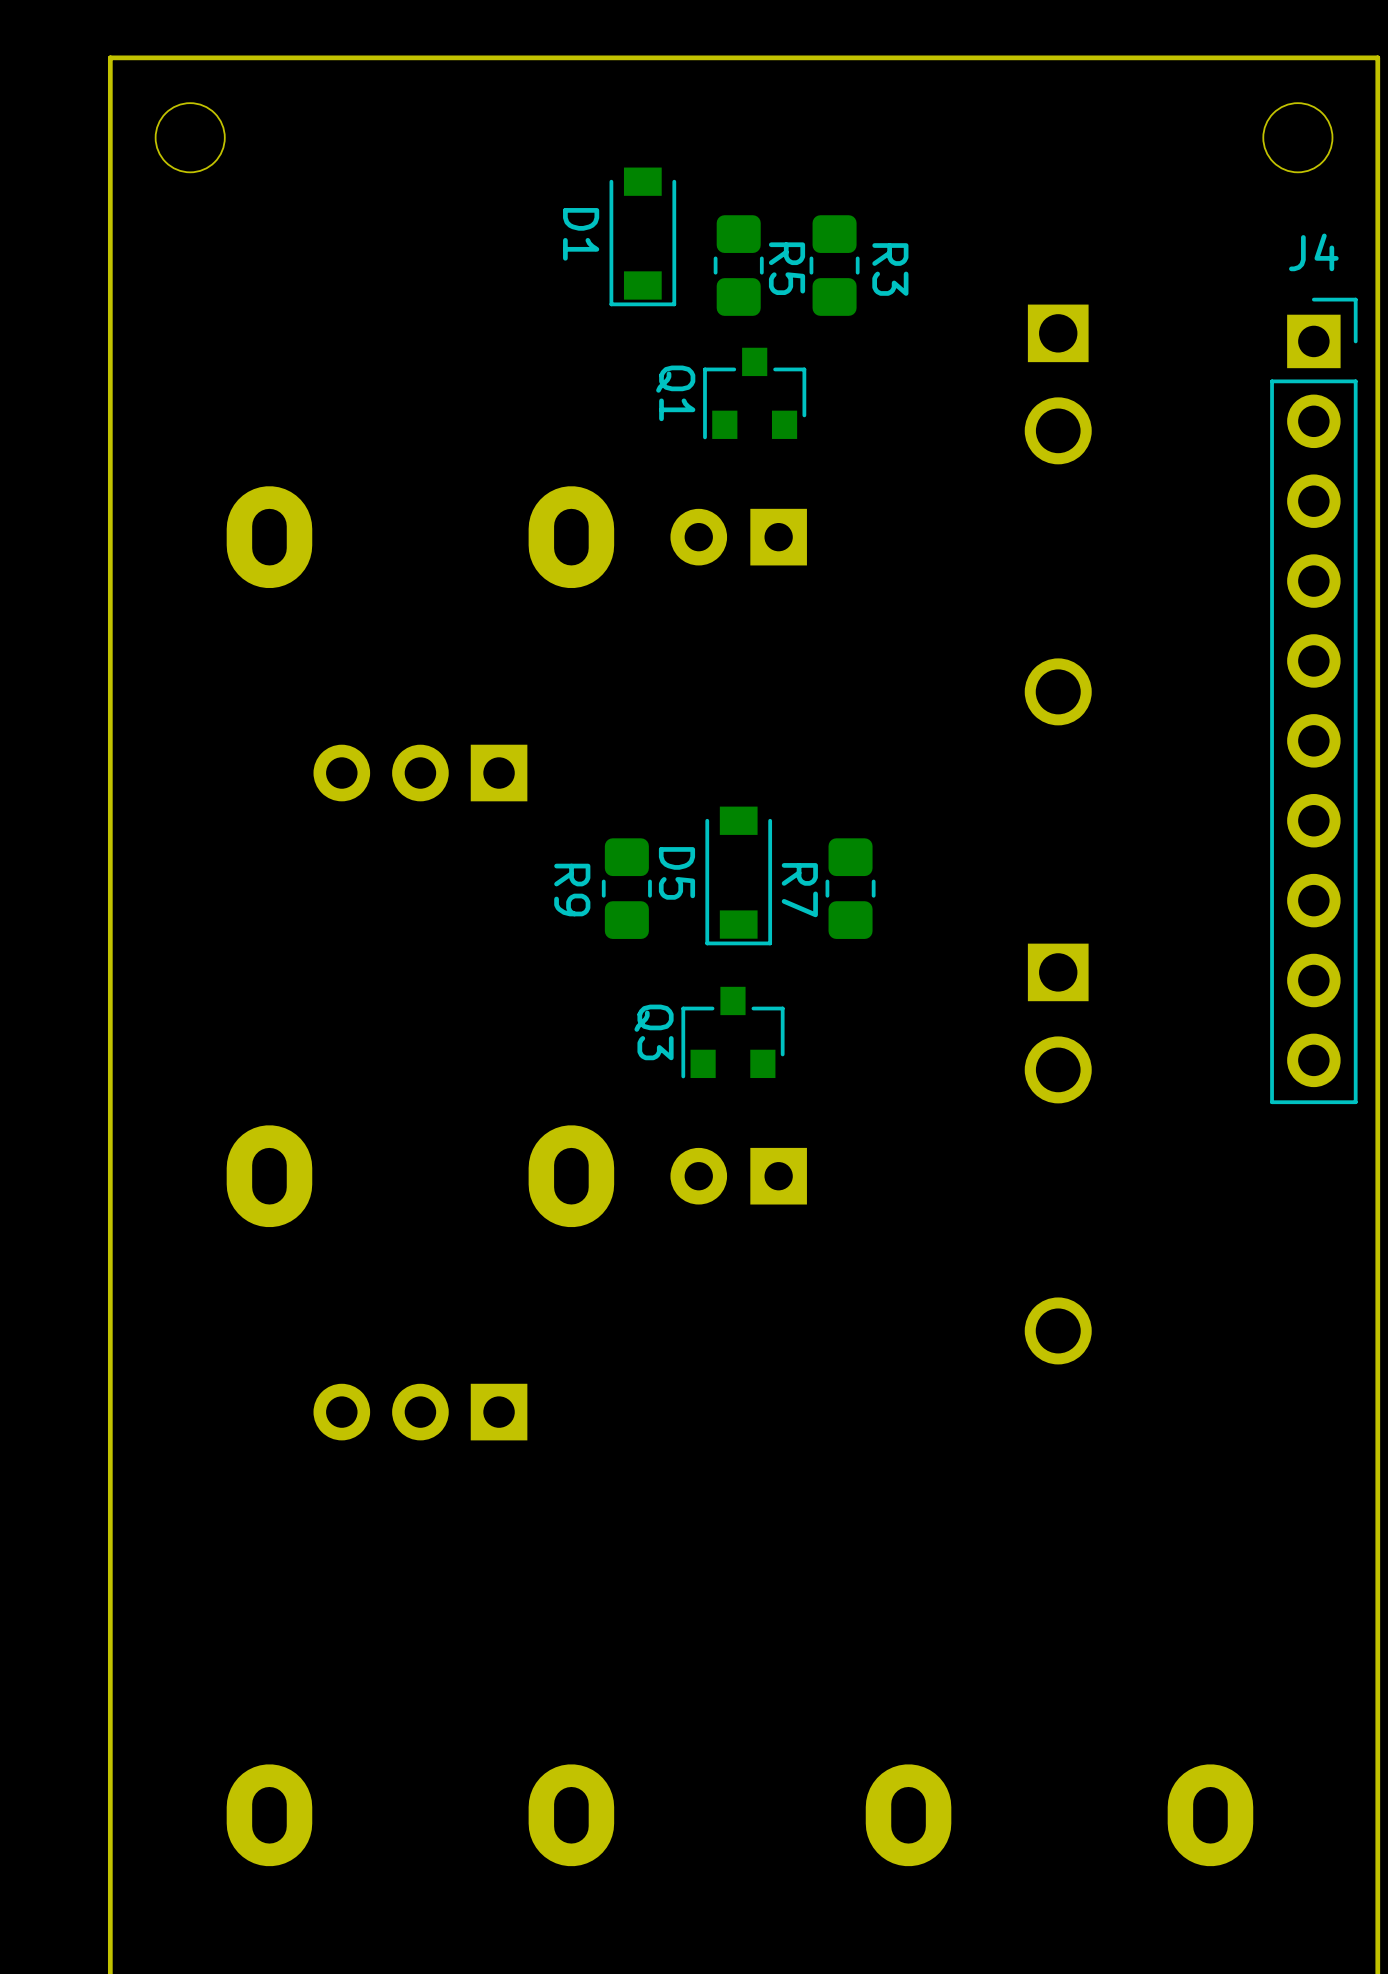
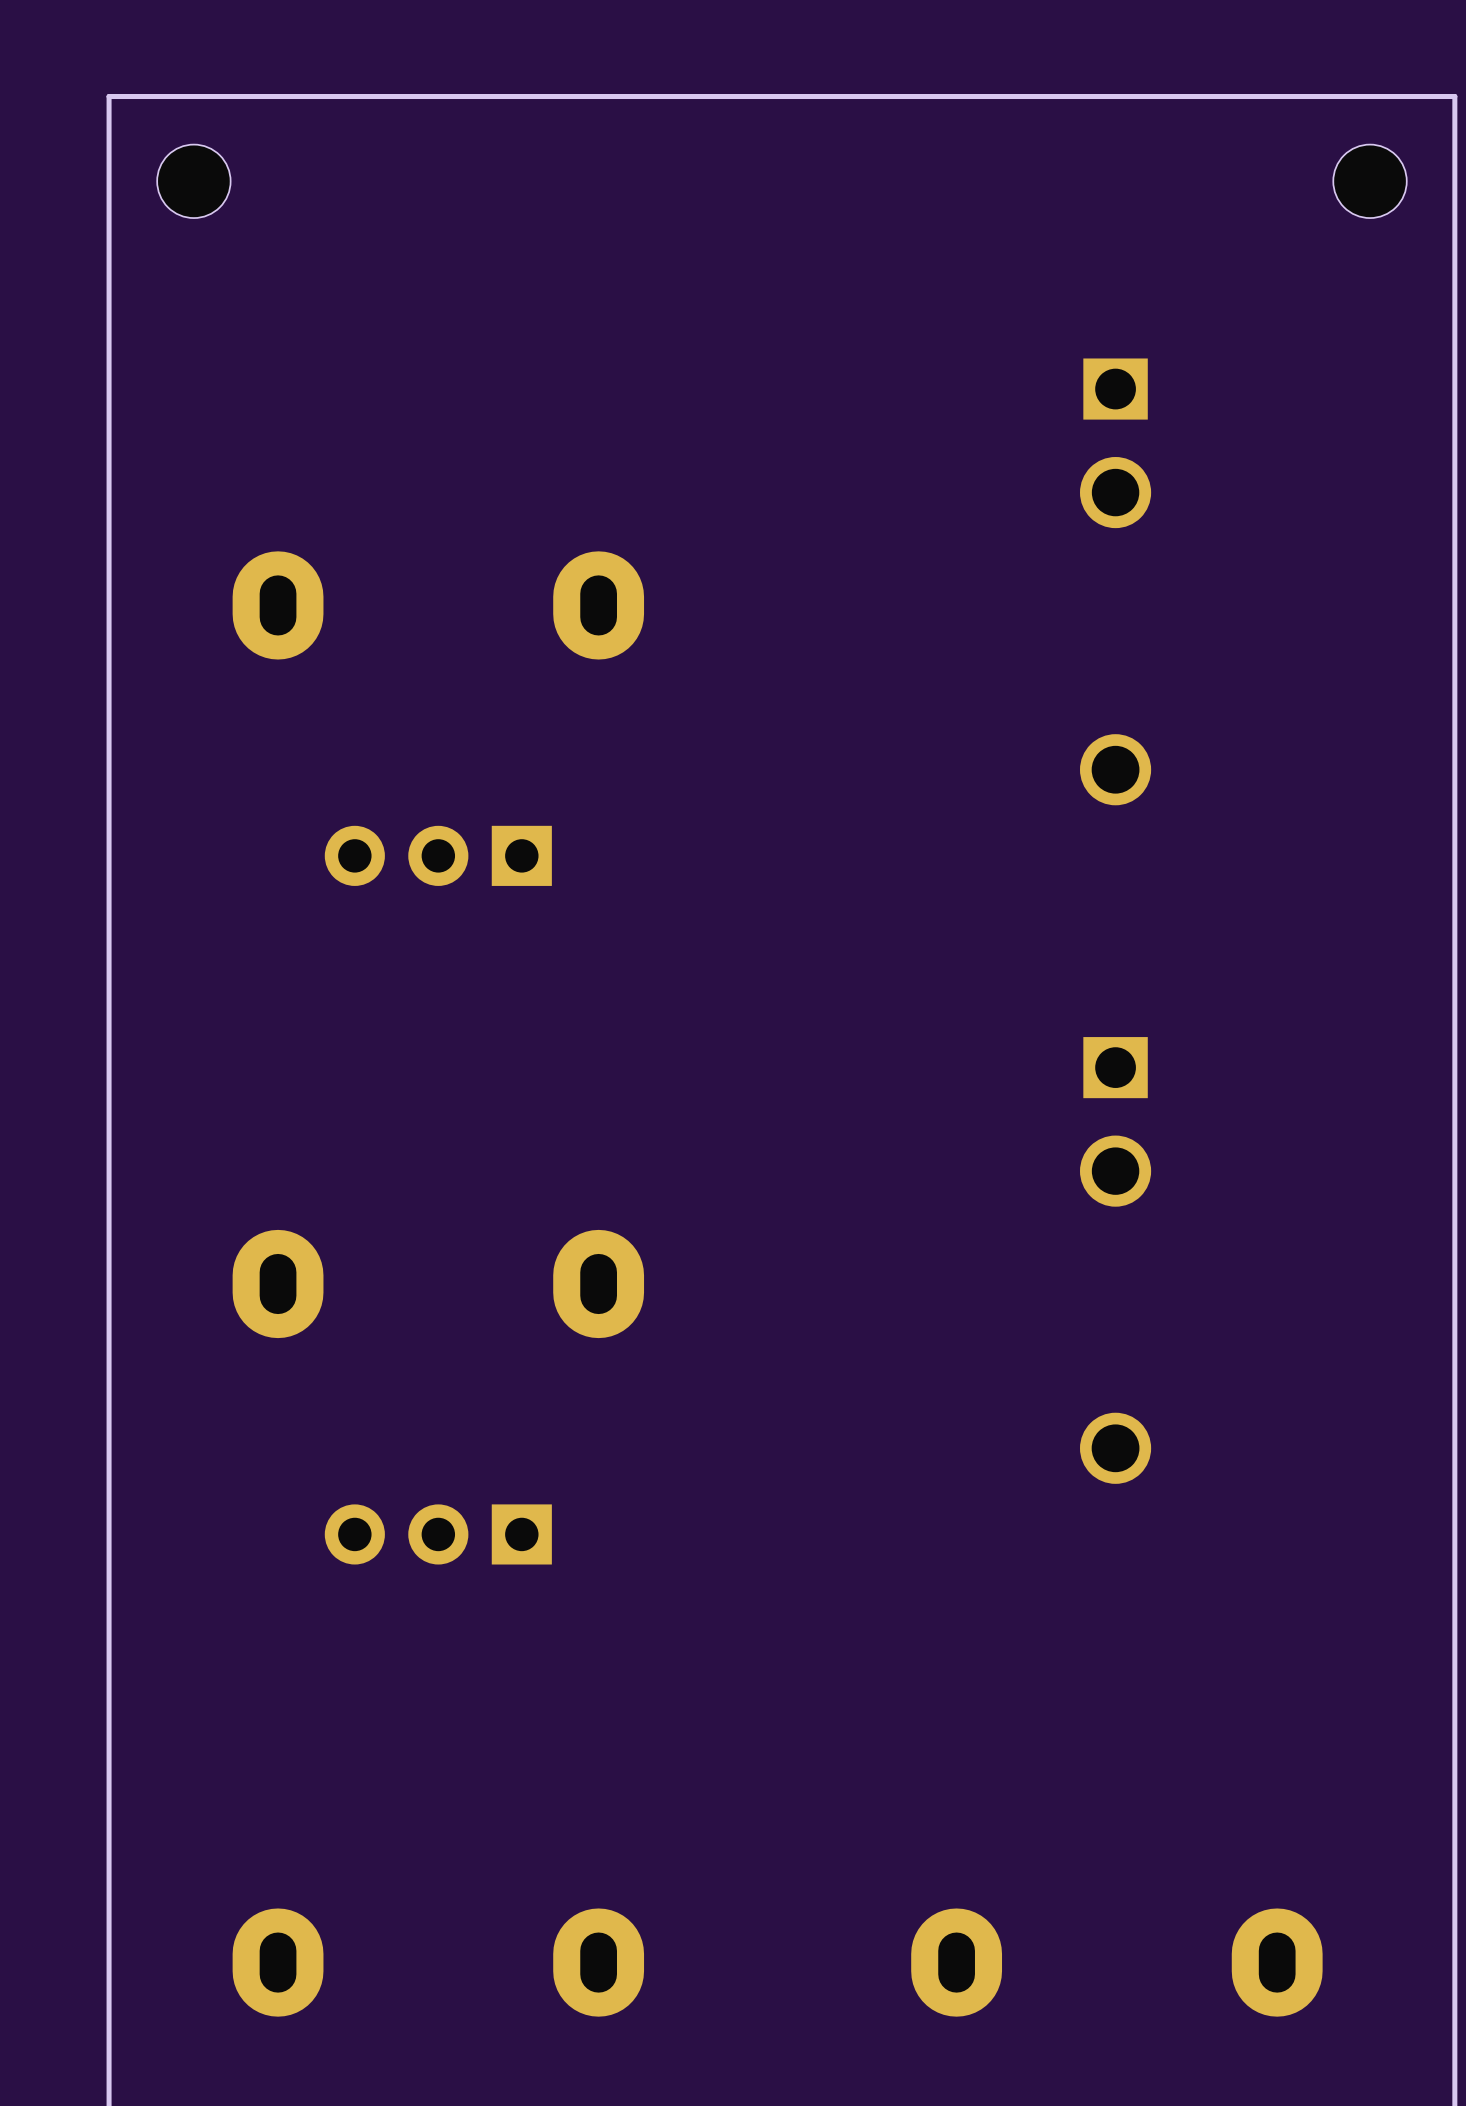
D1: (642, 236) -> none
R5: (738, 265) -> none
R3: (834, 265) -> none
Q1: (754, 393) -> none
part: (738, 537) -> none
J4: (1313, 700) -> none
D5: (738, 875) -> none
R9: (626, 888) -> none
R7: (850, 888) -> none
Q3: (732, 1032) -> none
part: (738, 1176) -> none

